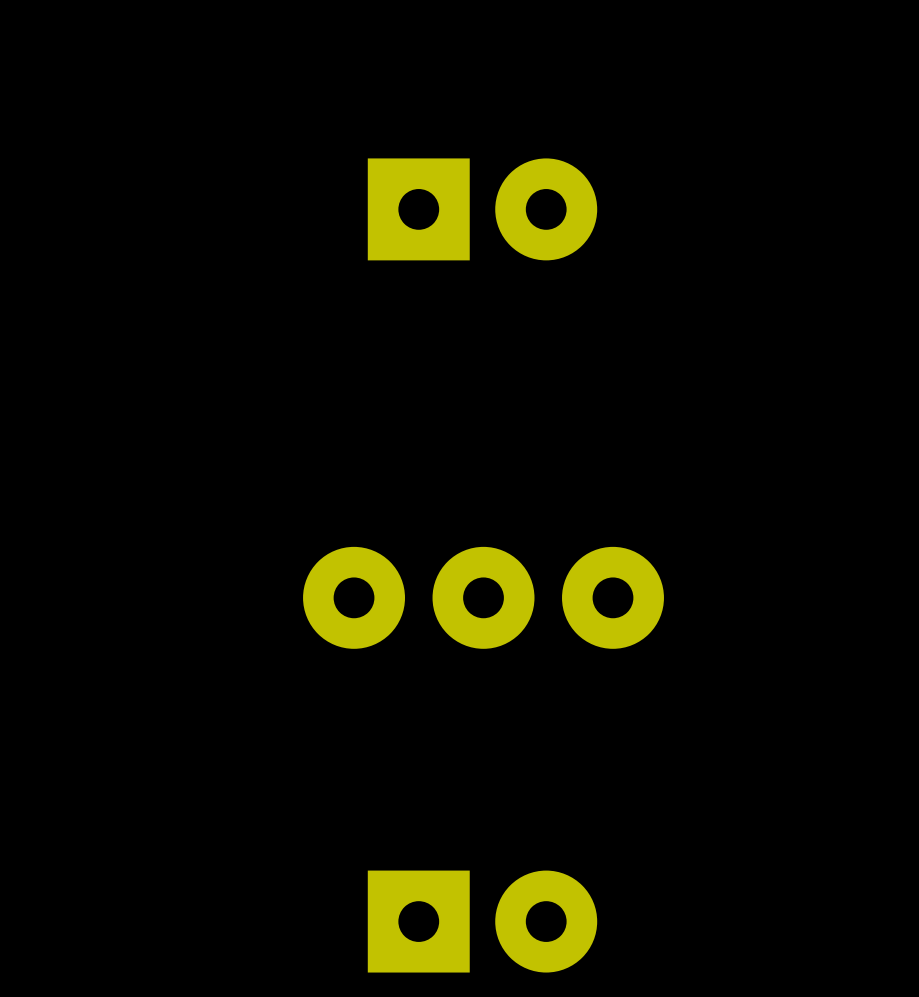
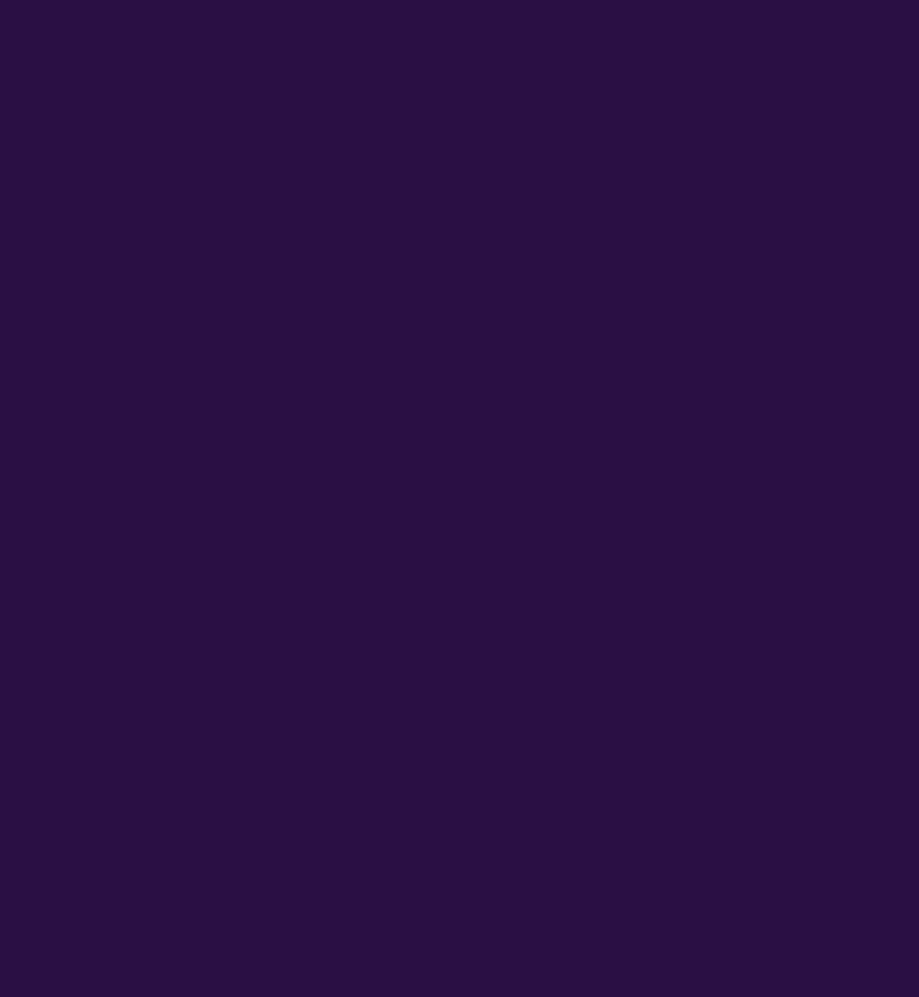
part: (482, 209) -> none
part: (483, 597) -> none
part: (482, 921) -> none

